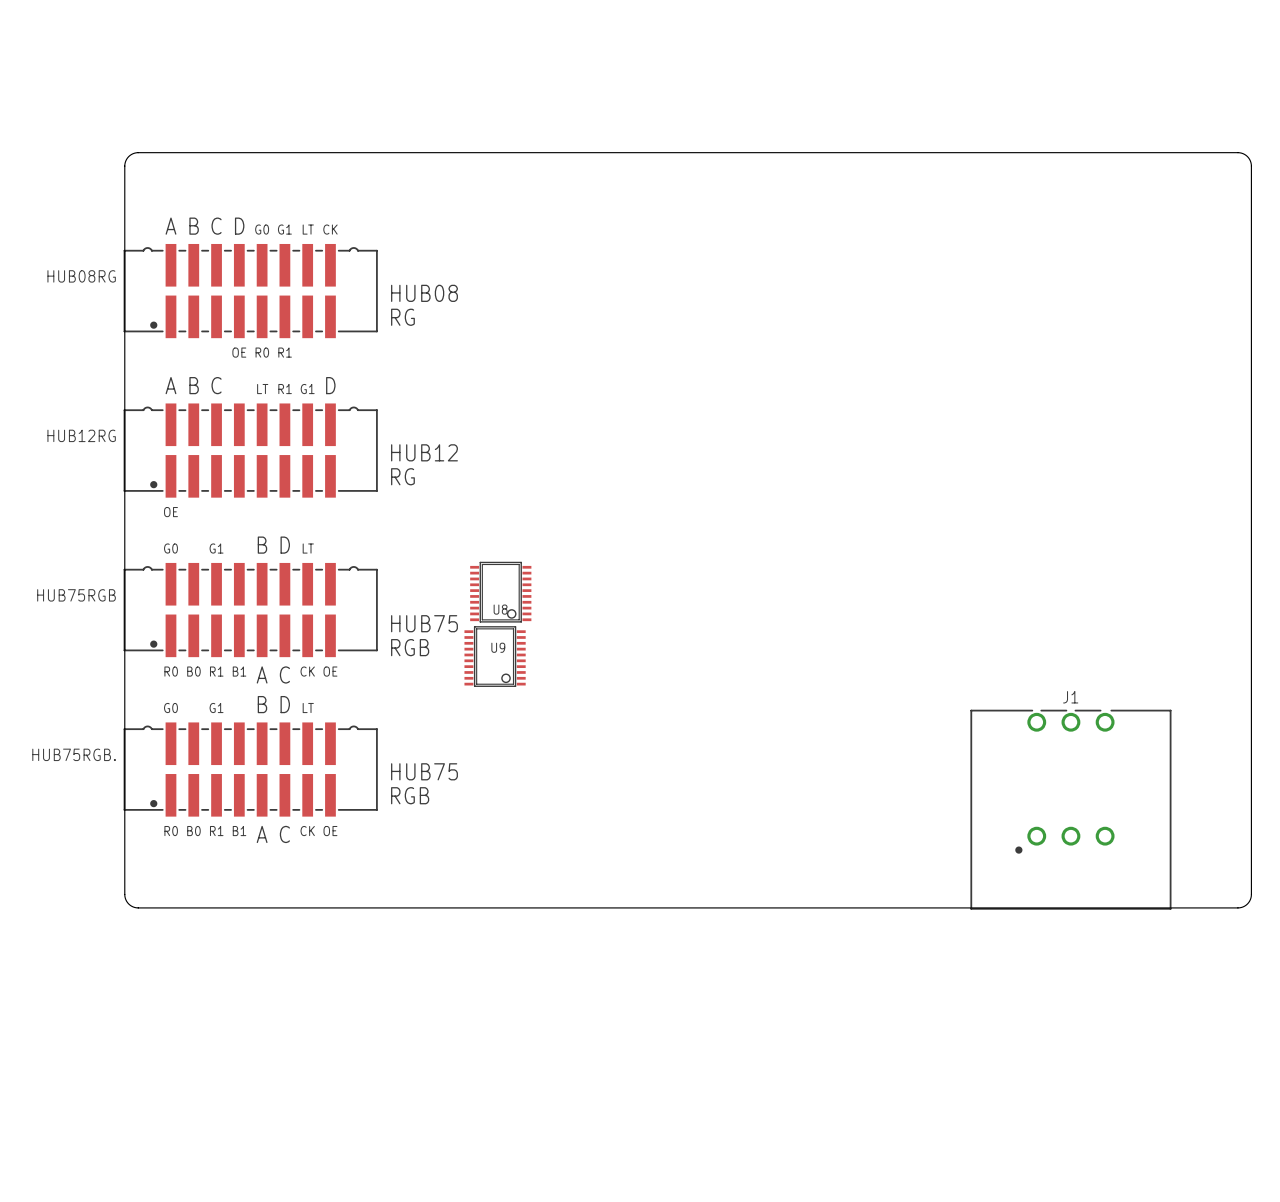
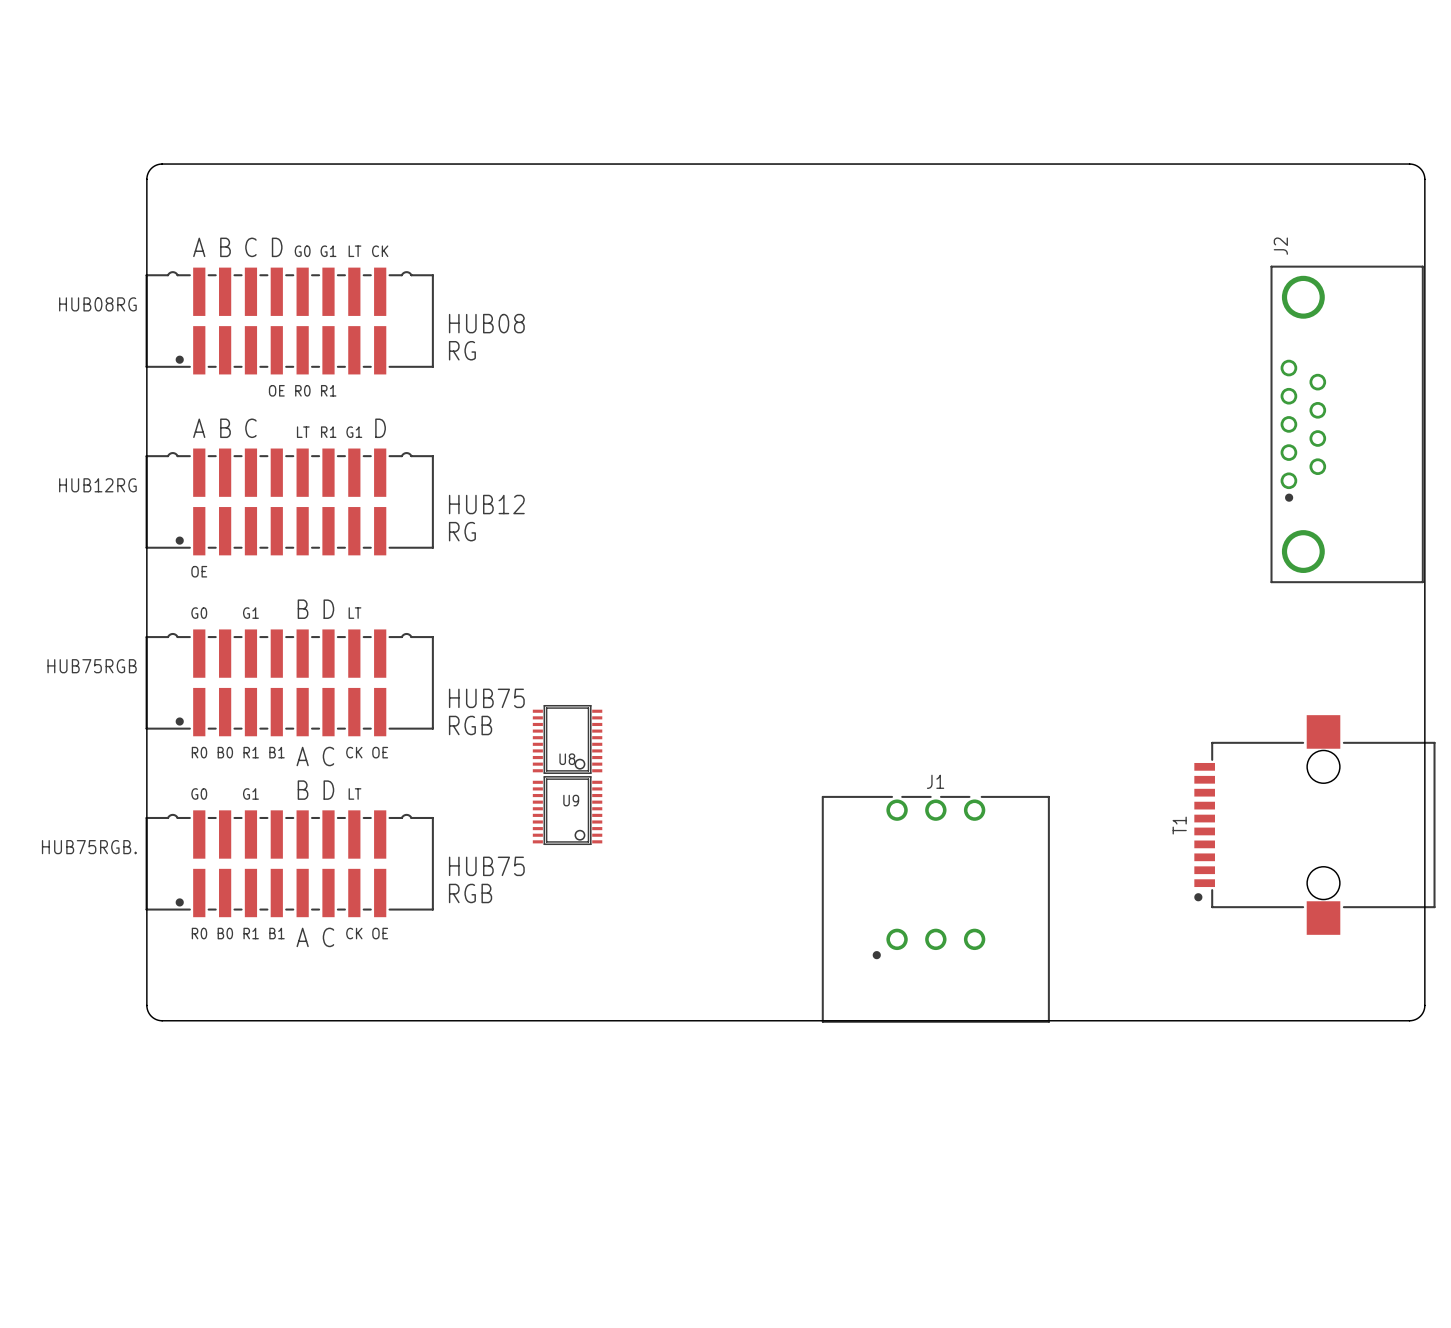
J2: none -> (1347, 424)
U8 position: (500, 592) -> (567, 739)
U9 position: (495, 656) -> (567, 810)
T1: none -> (1314, 825)
J1 position: (1070, 809) -> (935, 909)

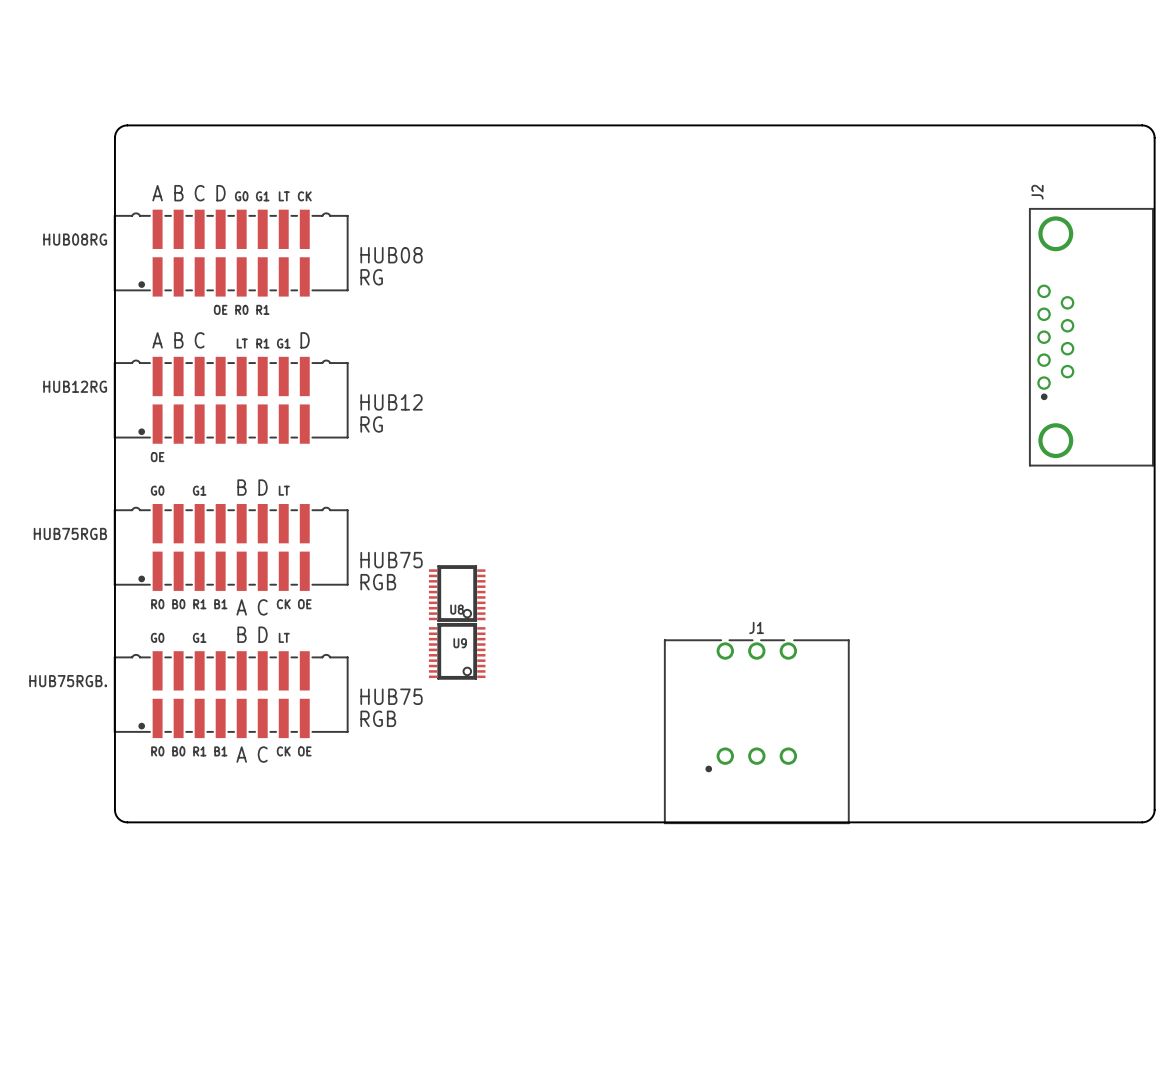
T1: (1314, 825) -> none

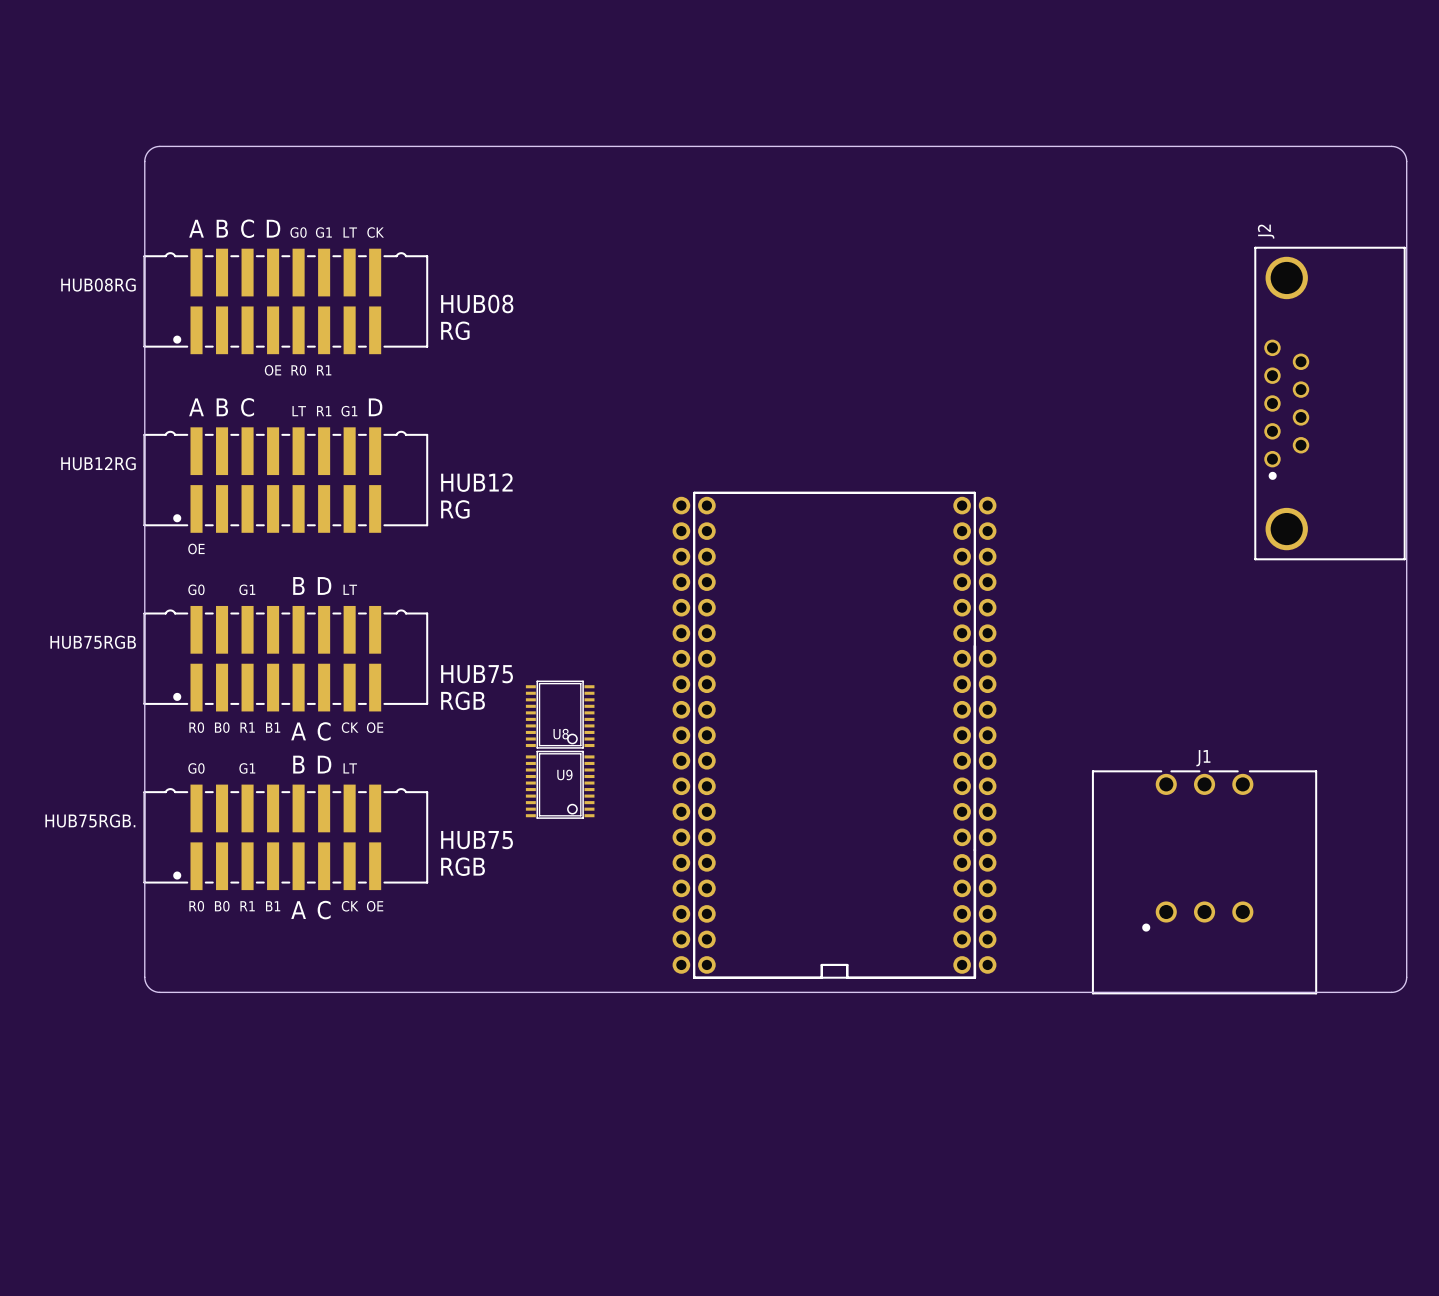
part: none -> (824, 735)
part: none -> (844, 735)
J1 position: (756, 731) -> (1204, 882)

